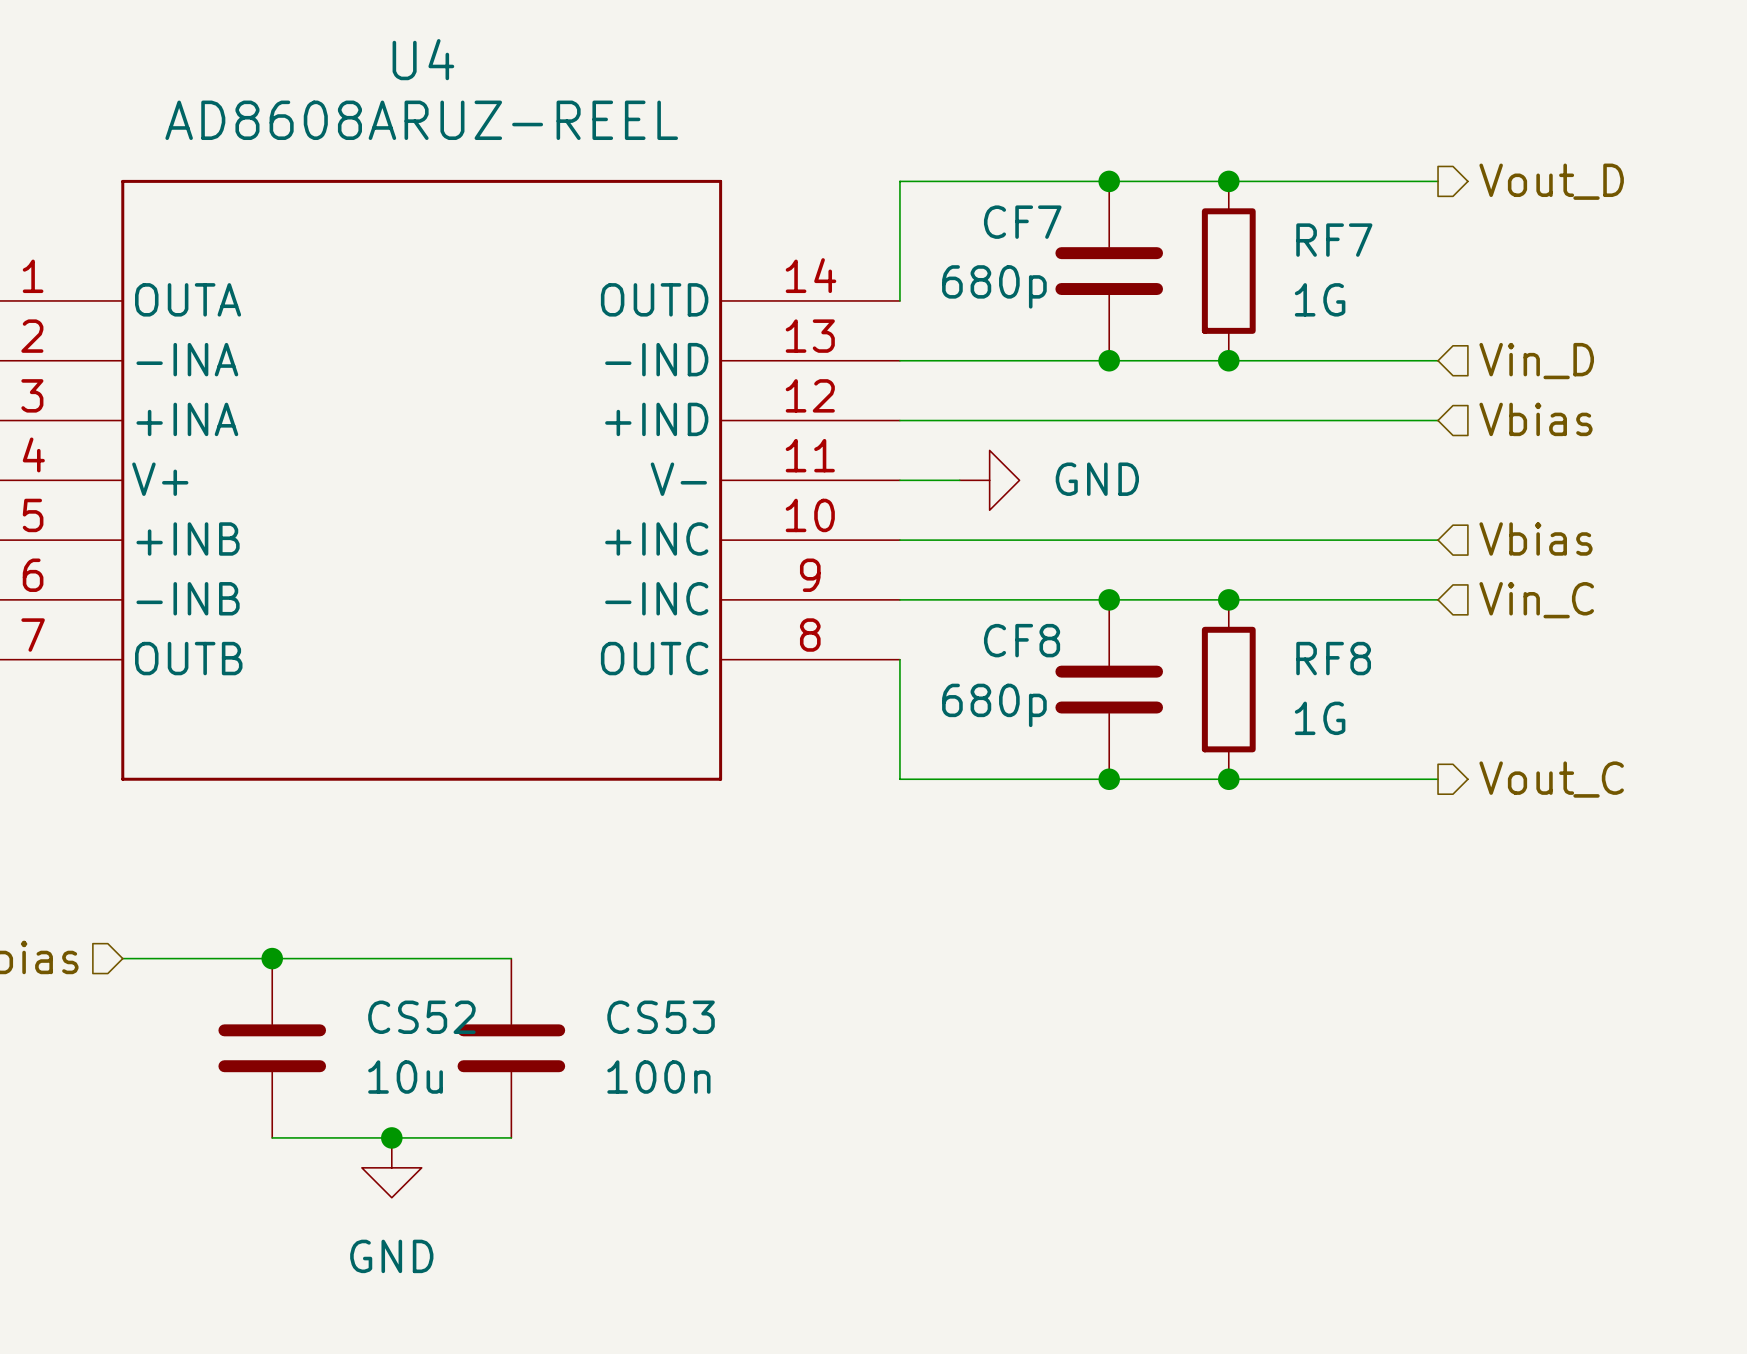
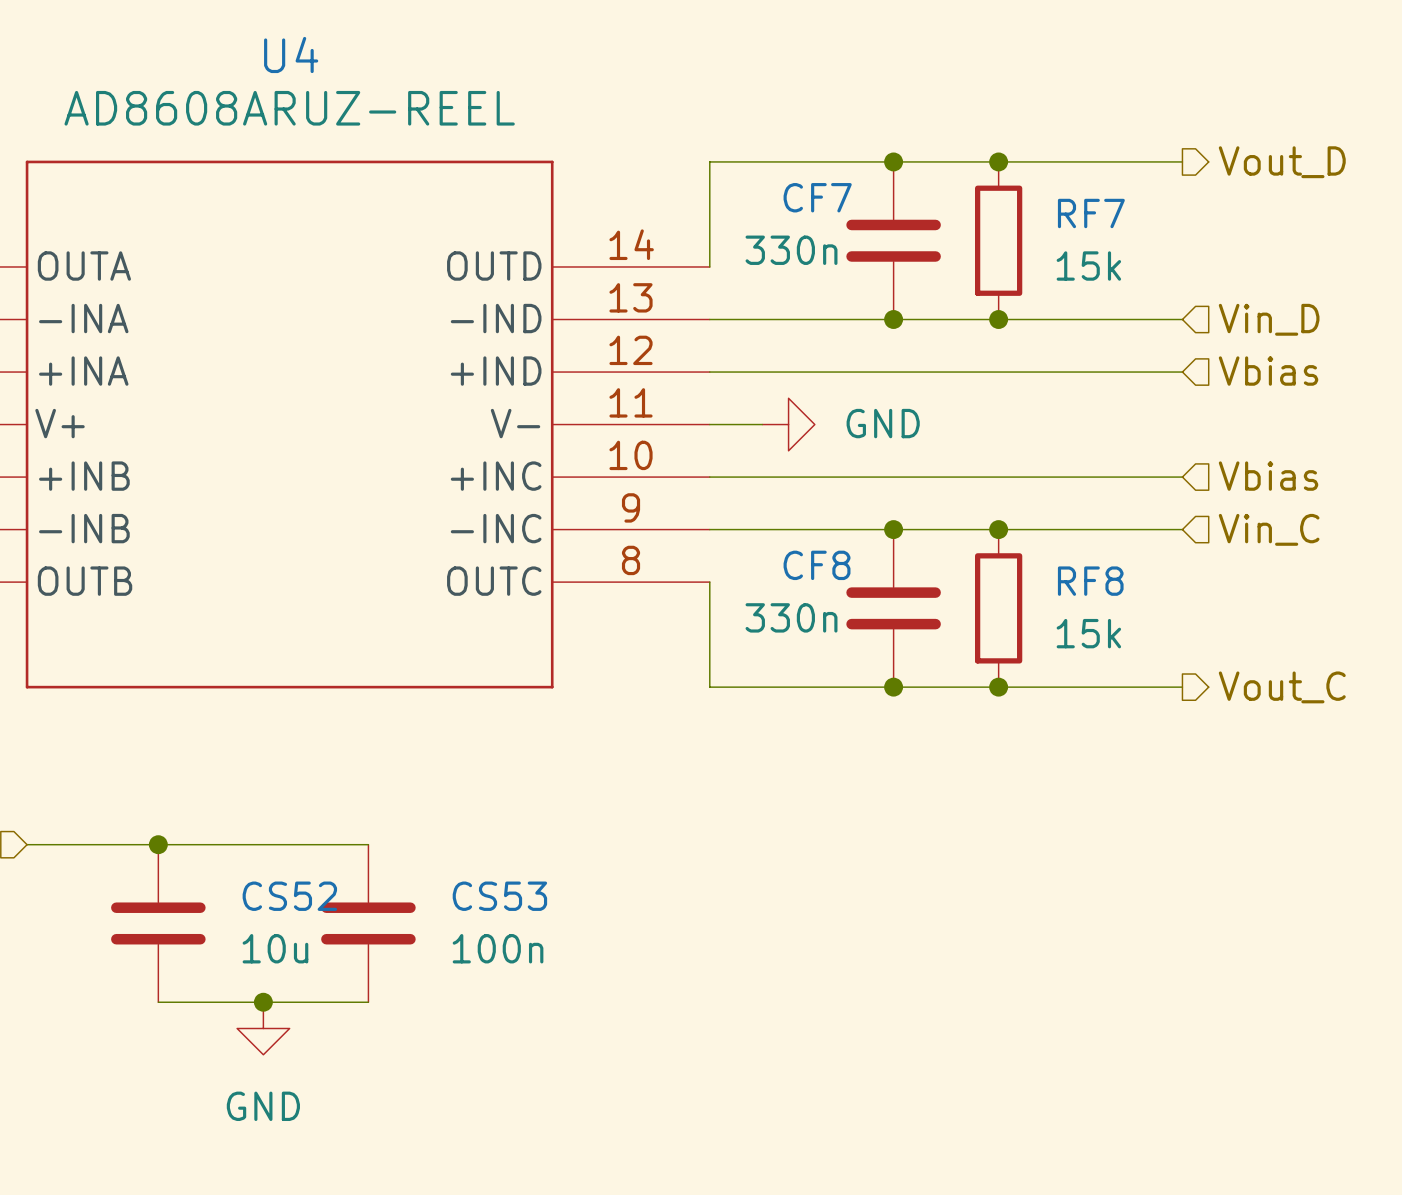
CF7 value: 680p (994, 286) -> 330n (791, 250)
RF7 value: 1G (1320, 299) -> 15k (1088, 266)
CF8 value: 680p (994, 705) -> 330n (791, 617)
RF8 value: 1G (1320, 718) -> 15k (1088, 633)

